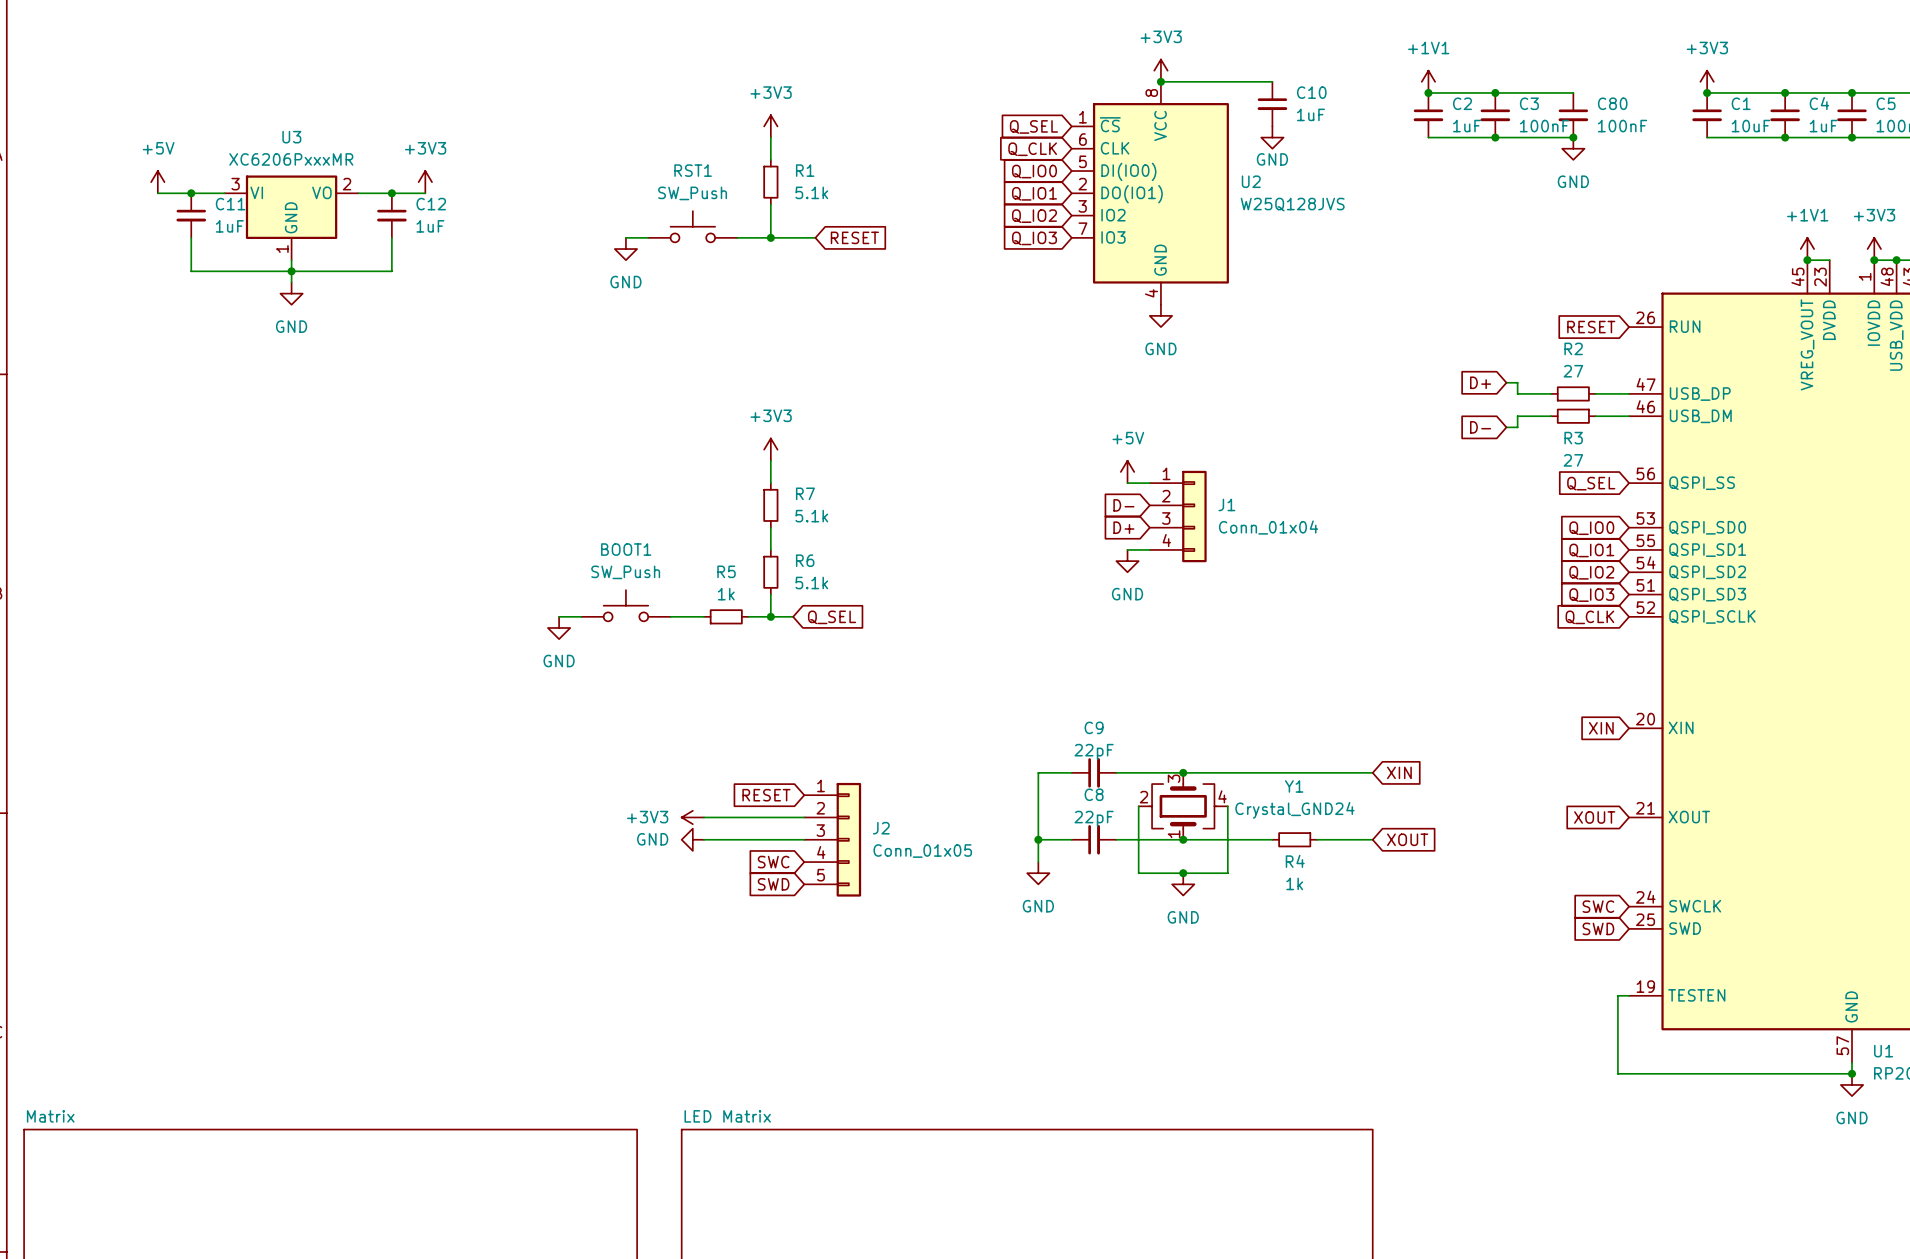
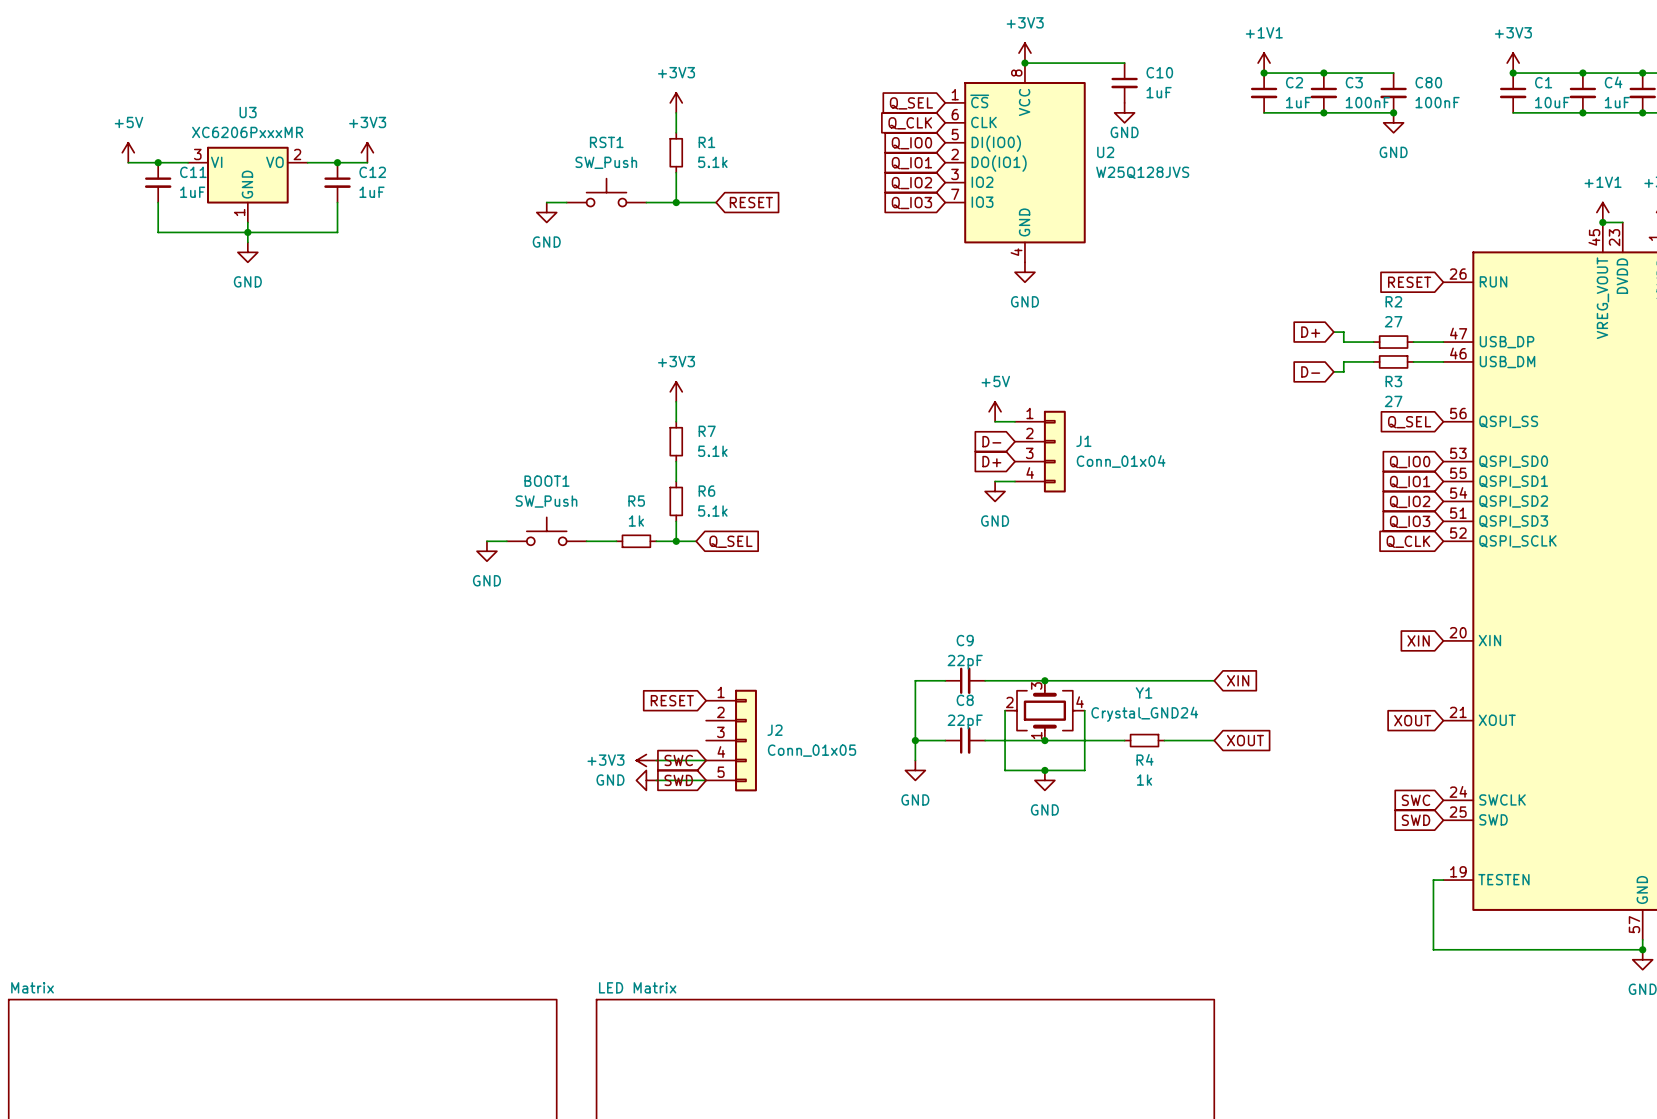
power symbol position: +3V3 (692, 817) -> +3V3 (646, 760)
wire: (703, 817) (804, 817) -> none
power symbol position: GND (692, 839) -> GND (646, 780)
wire: (703, 839) (804, 839) -> none
wire: none -> (656, 760) (706, 760)
wire: none -> (656, 780) (706, 780)

